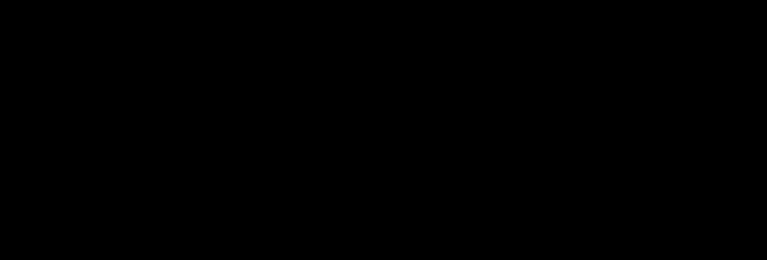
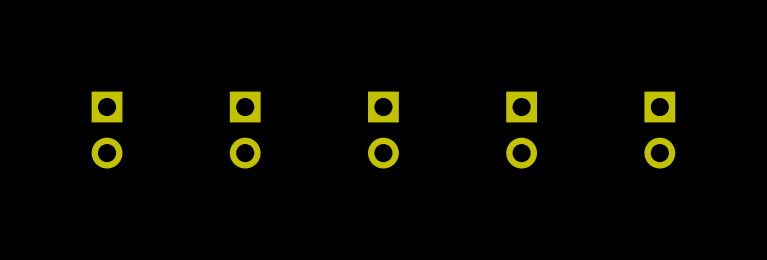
part: none -> (107, 130)
part: none -> (245, 130)
part: none -> (383, 130)
part: none -> (521, 130)
part: none -> (659, 130)

